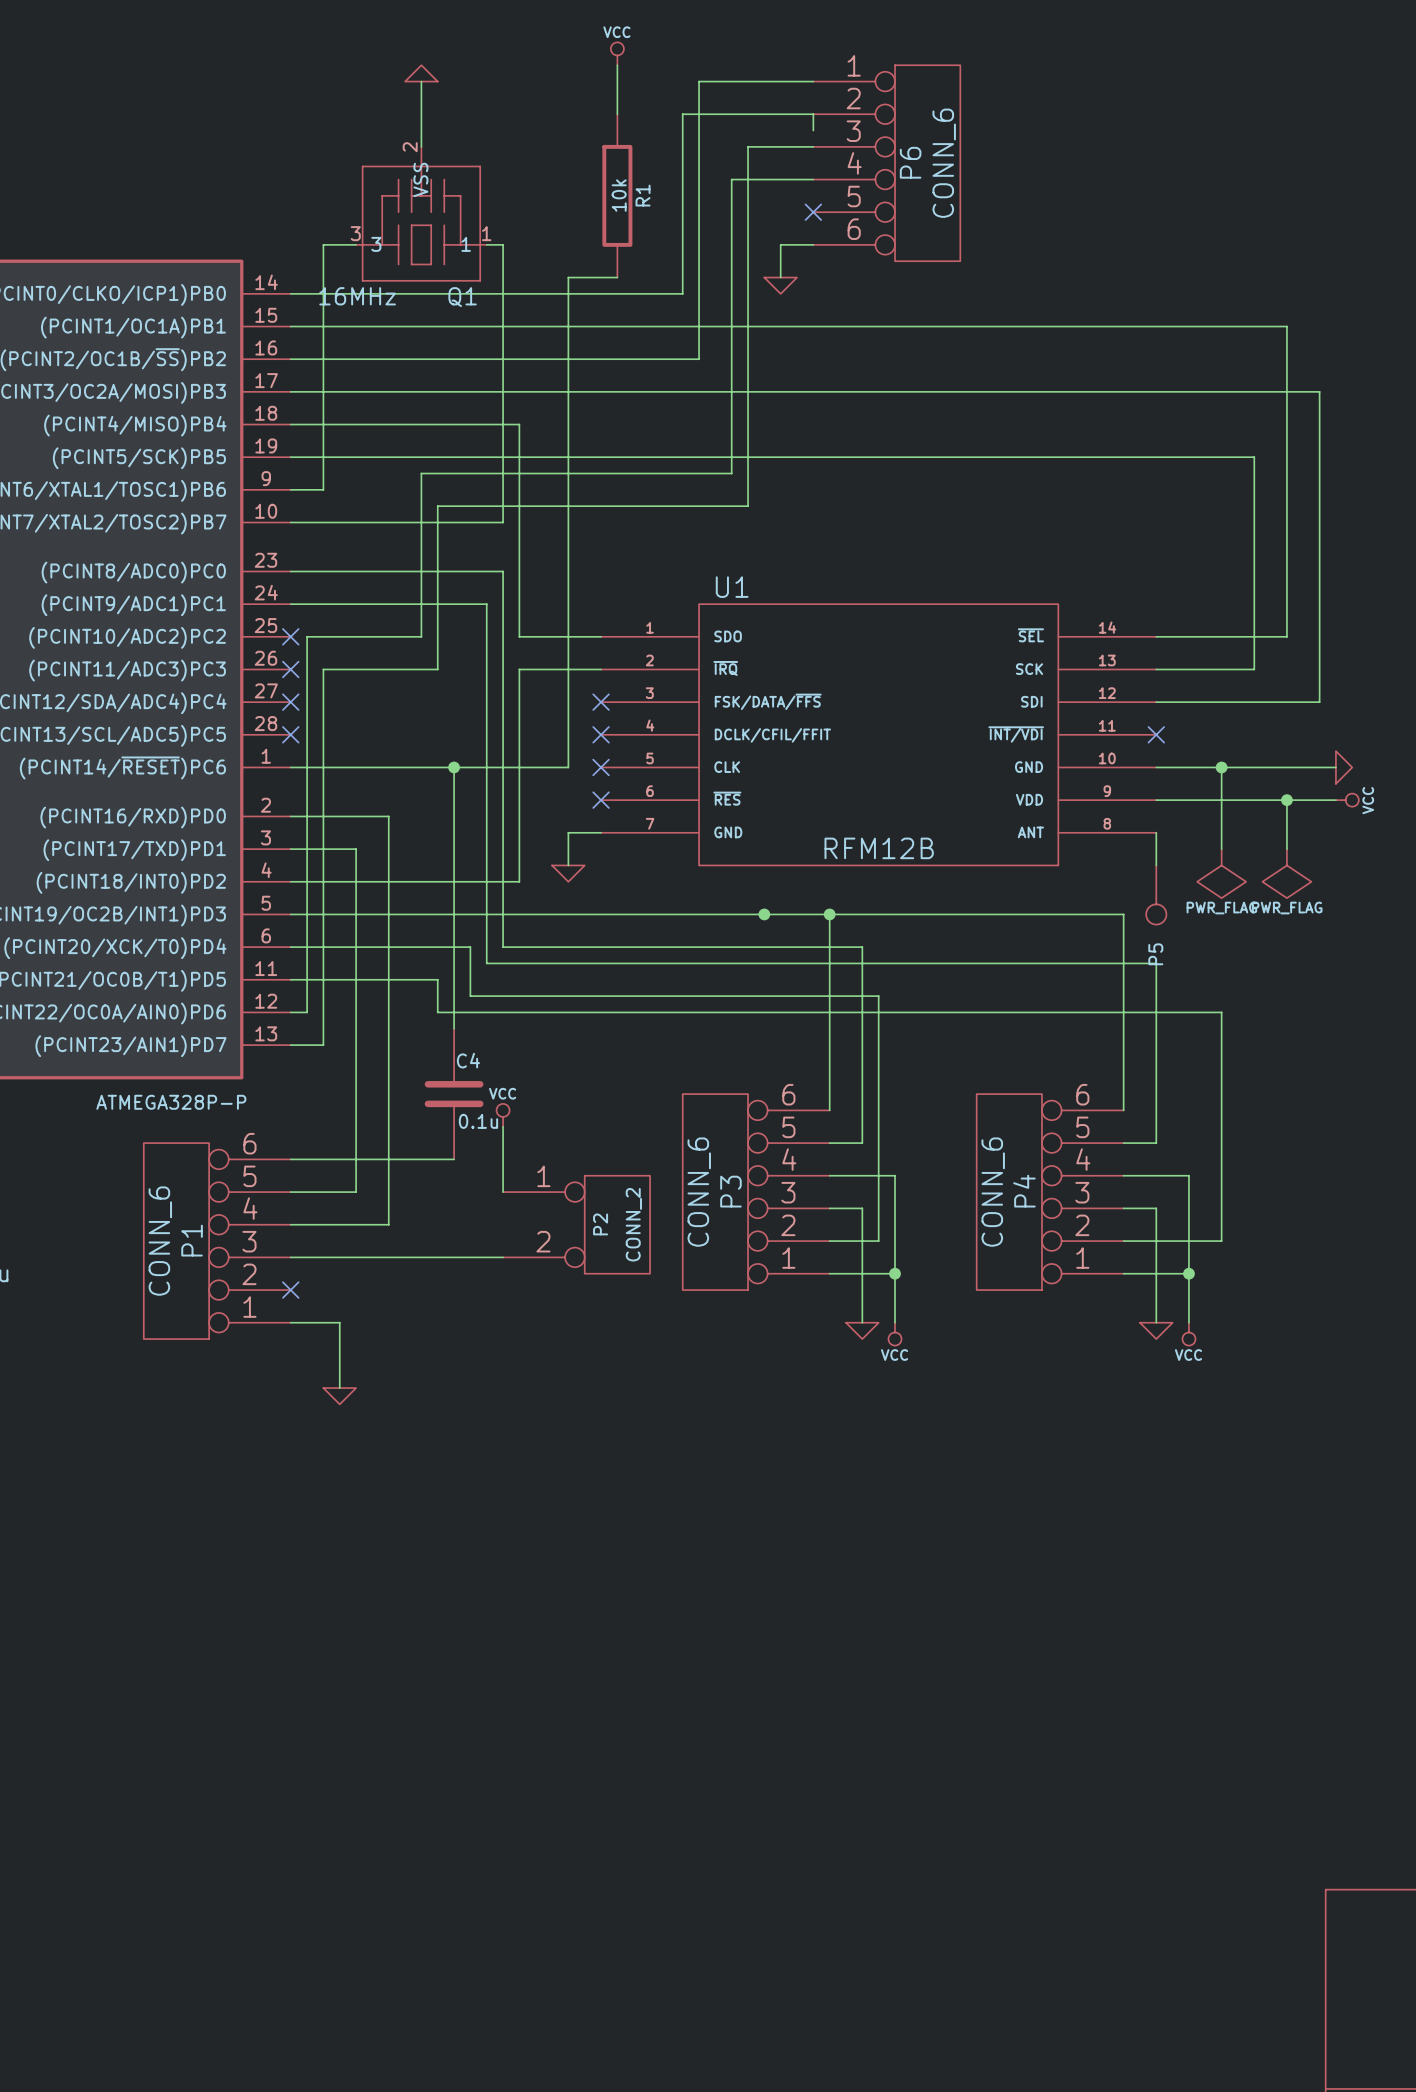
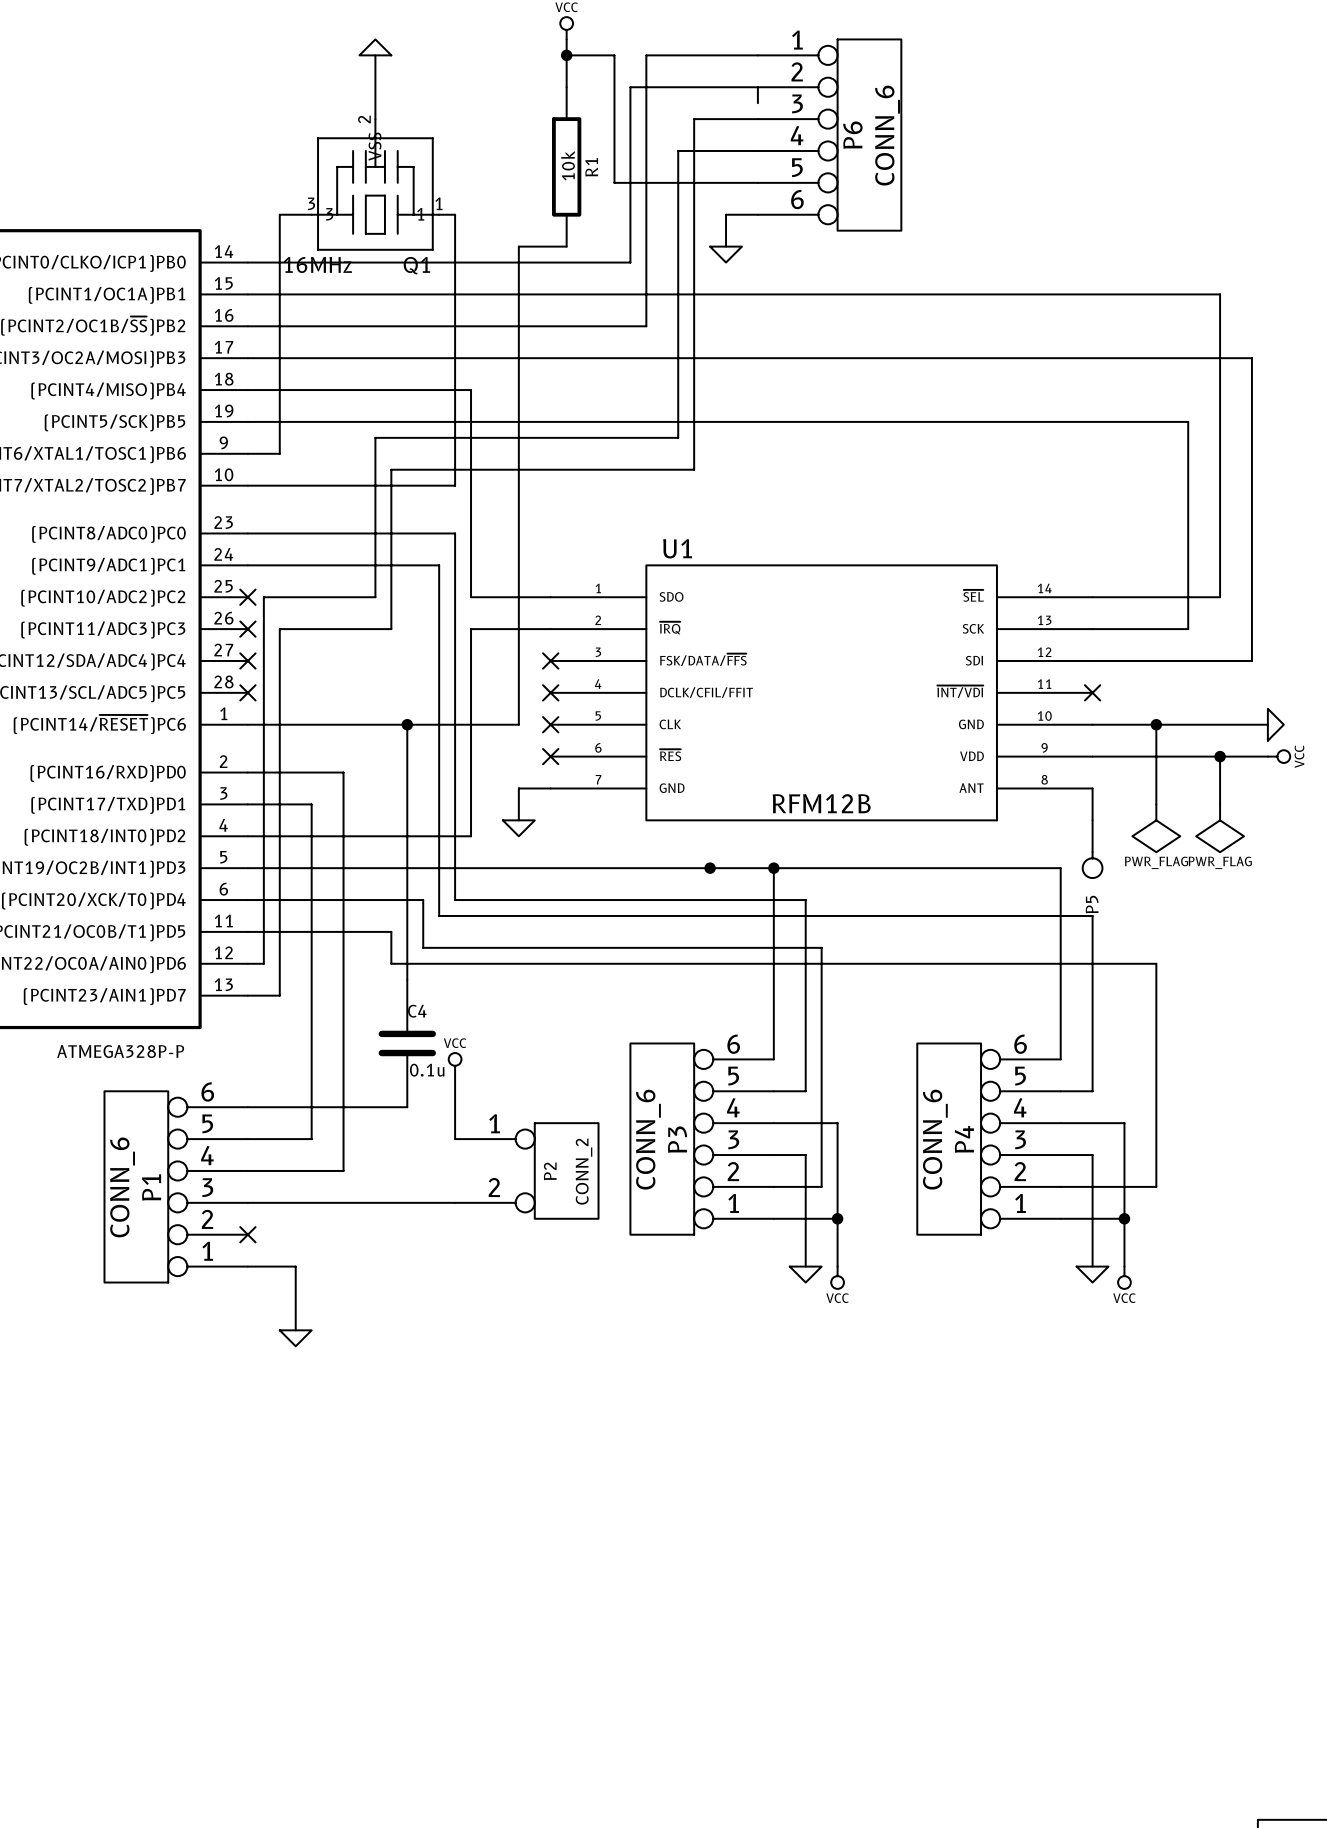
wire: none -> (566, 55) (614, 55) (614, 182) (757, 182)
junction: none -> (566, 55)
no-connect mark: (813, 212) -> none

